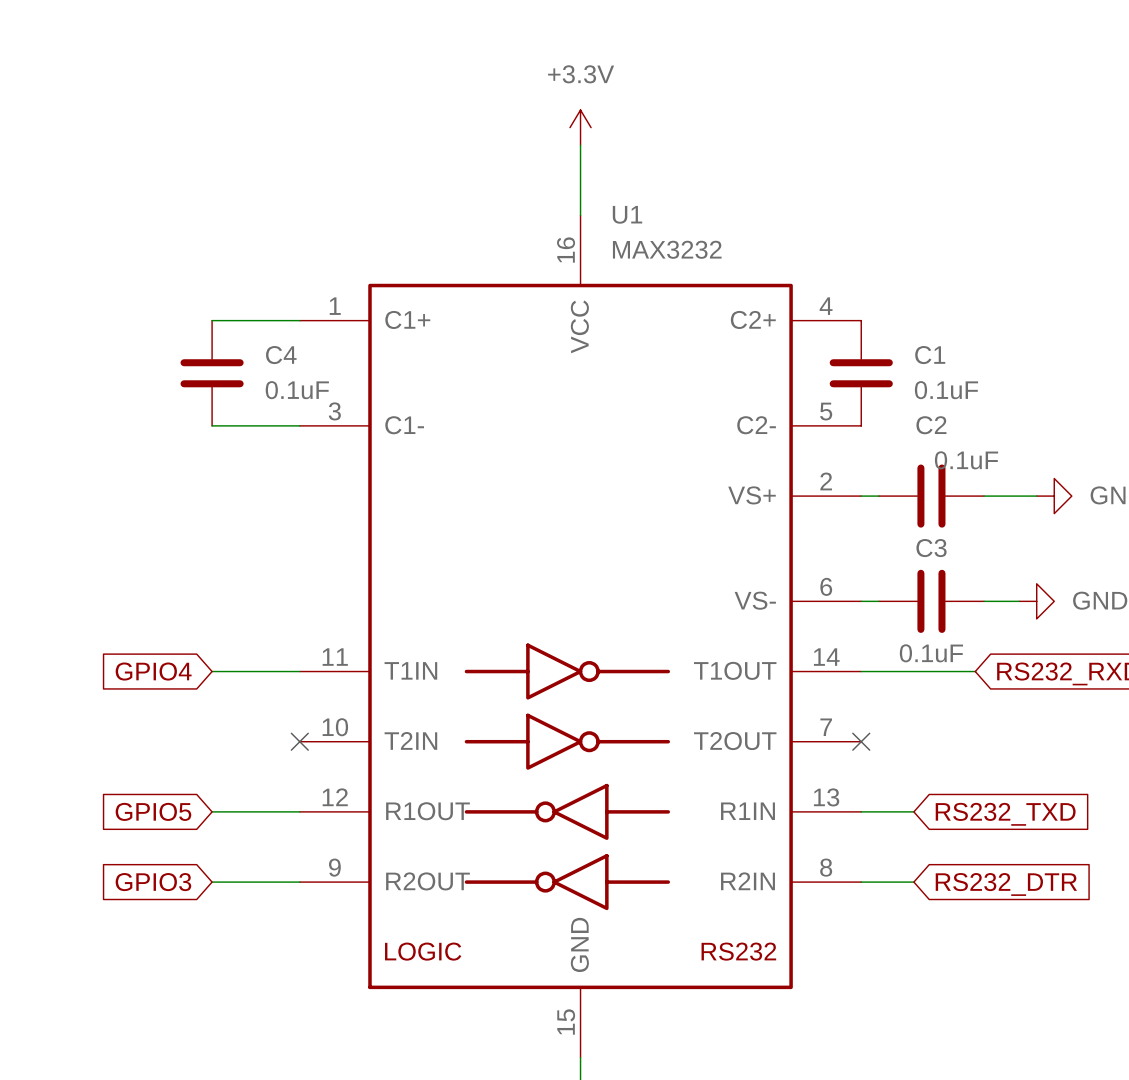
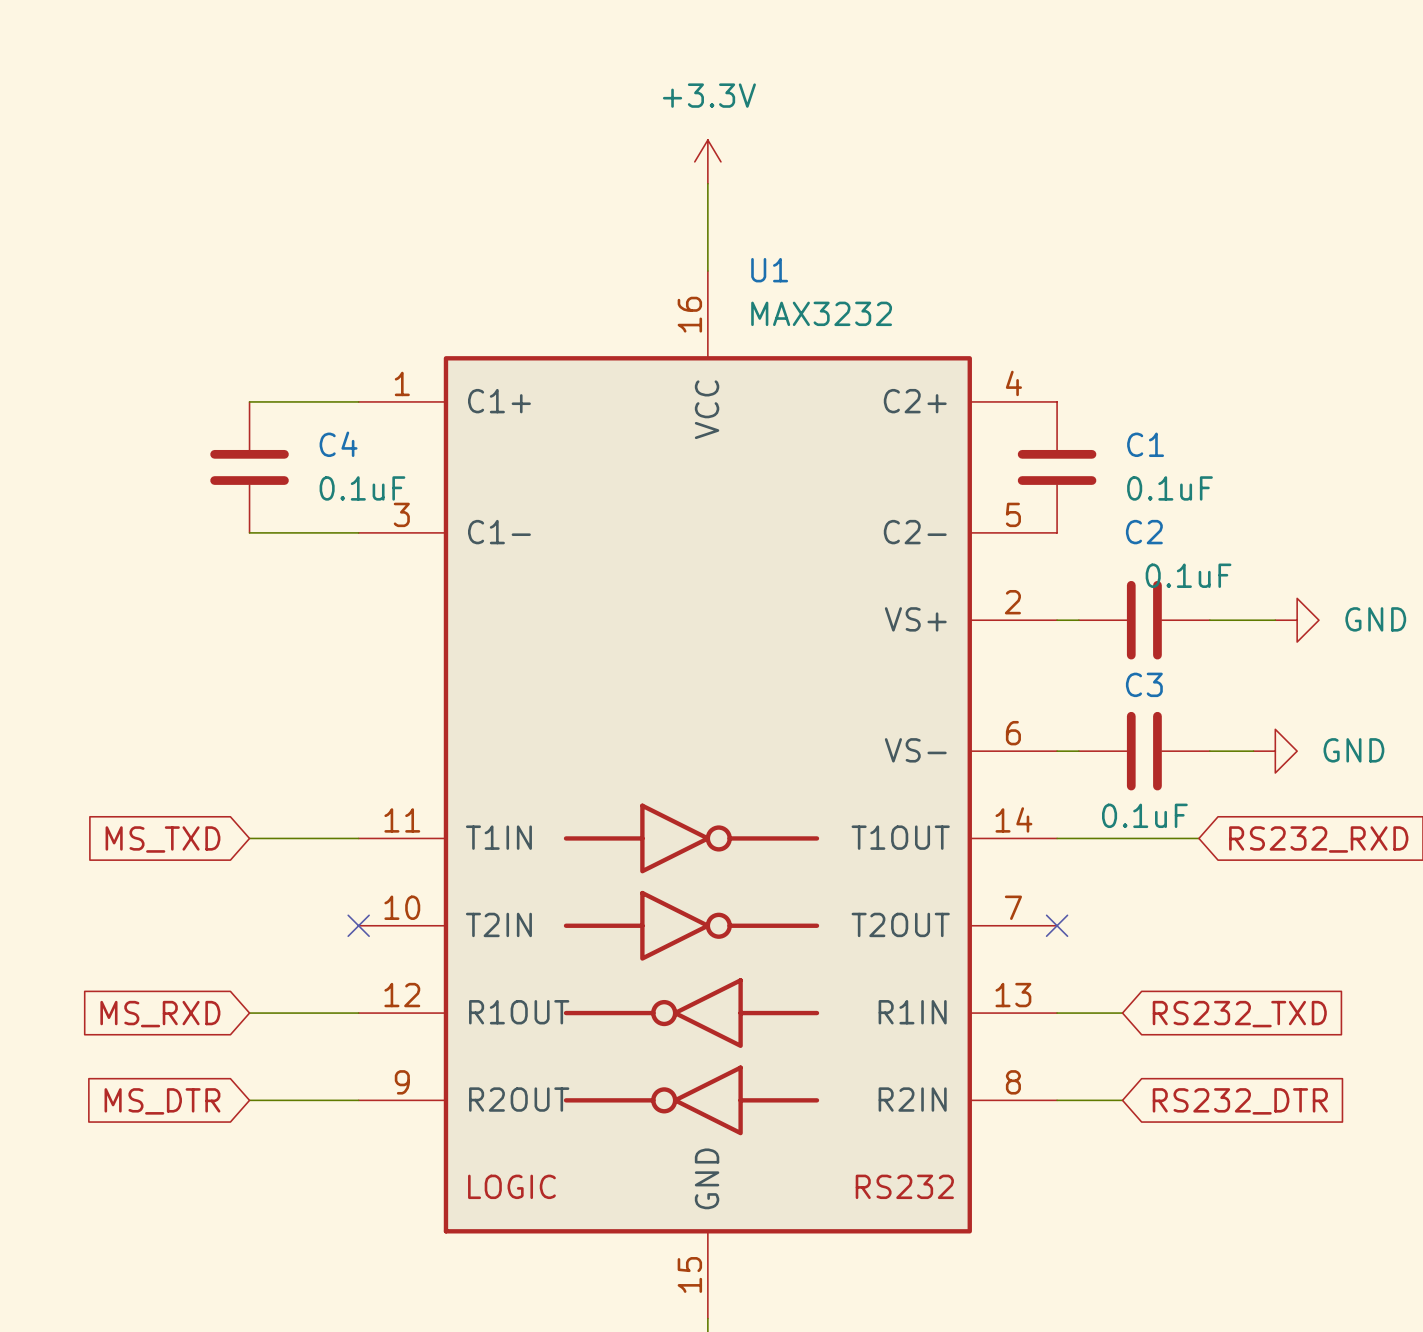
global label: GPIO4 (153, 671) -> MS_TXD (162, 839)
global label: GPIO5 (153, 811) -> MS_RXD (160, 1014)
global label: GPIO3 (153, 882) -> MS_DTR (162, 1101)

